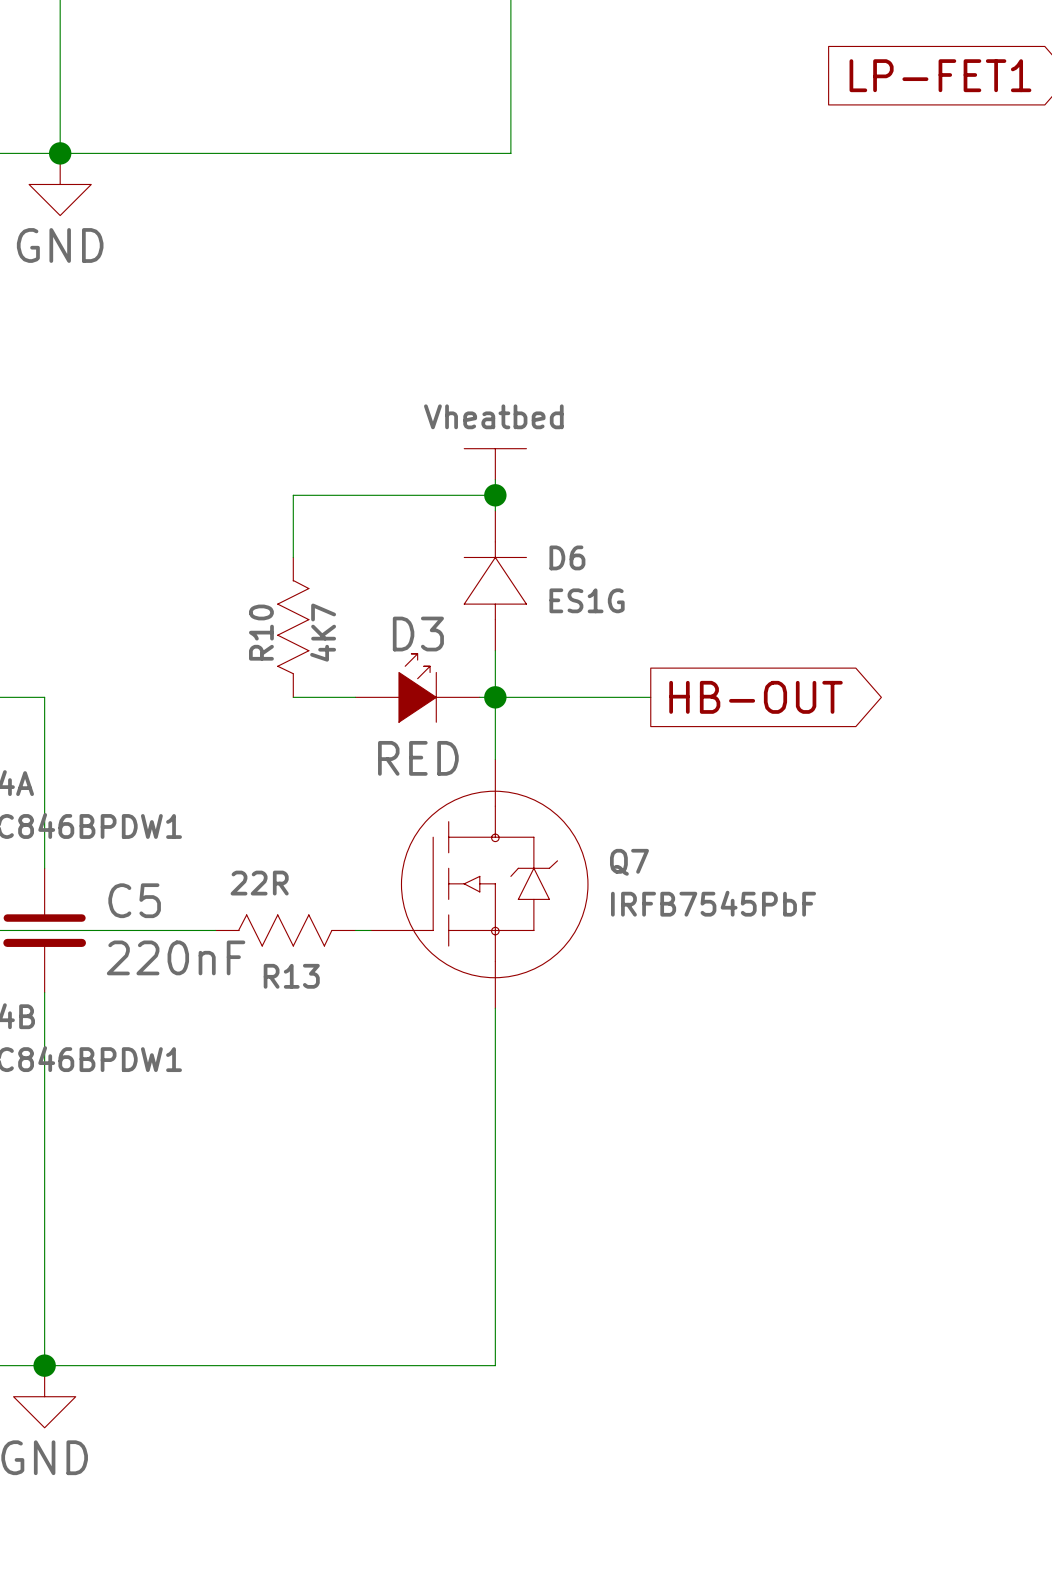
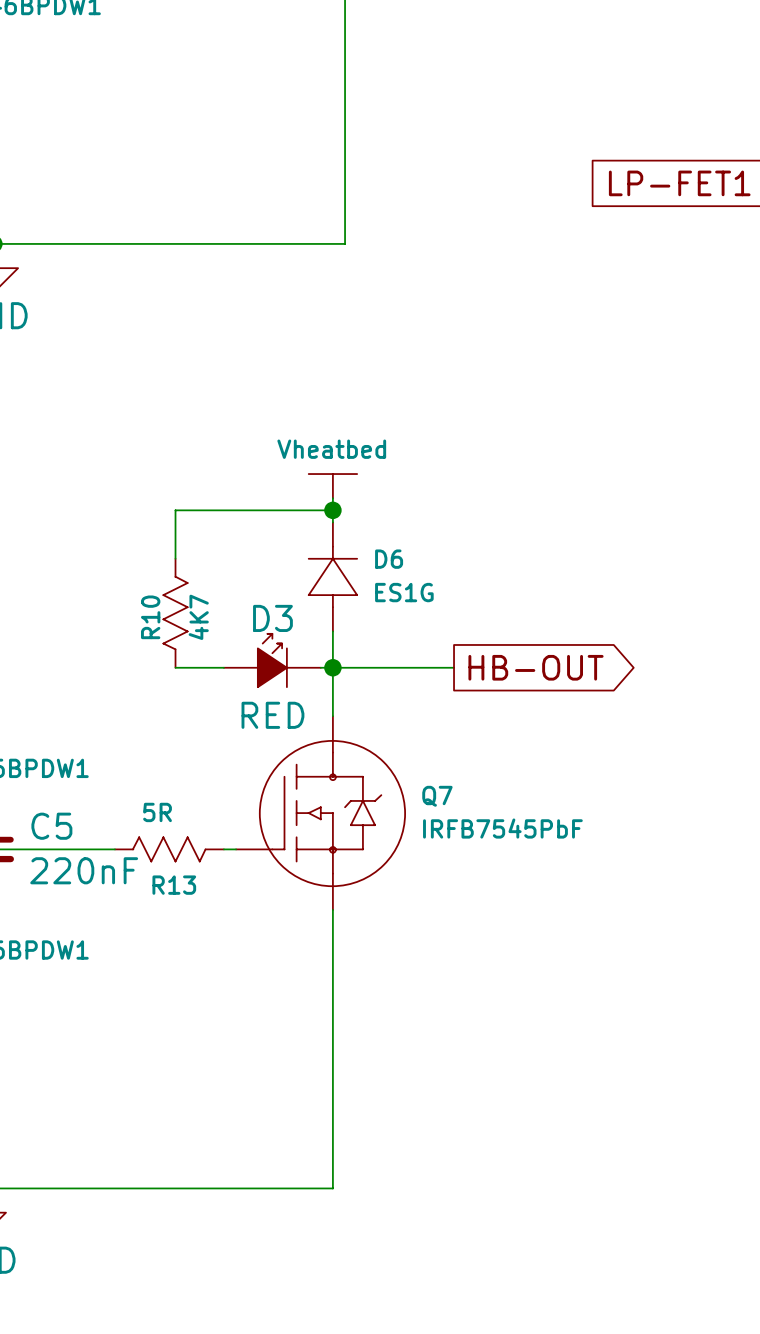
R13 value: 22R (259, 883) -> 5R (157, 812)

